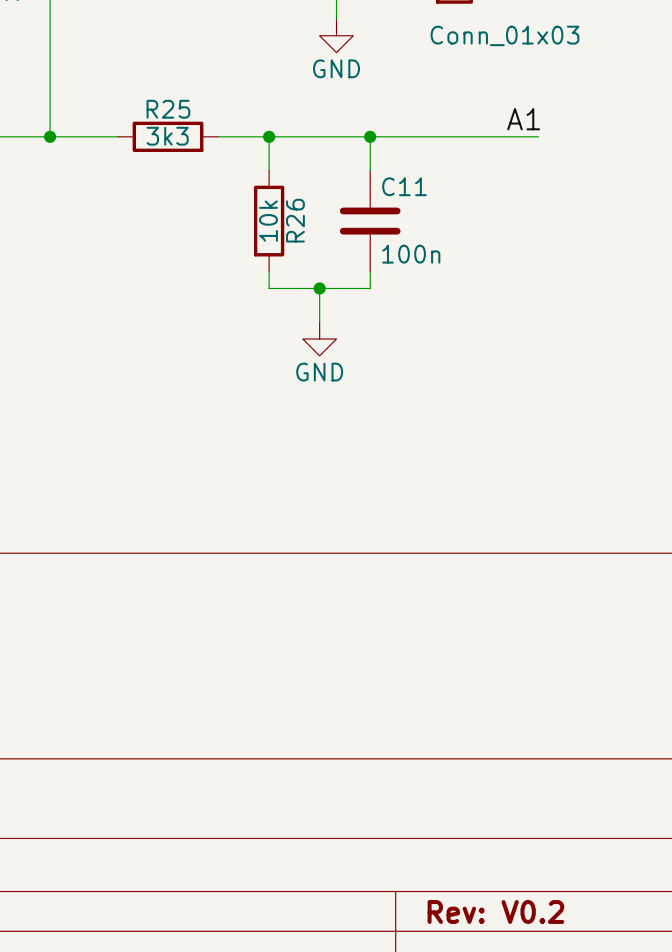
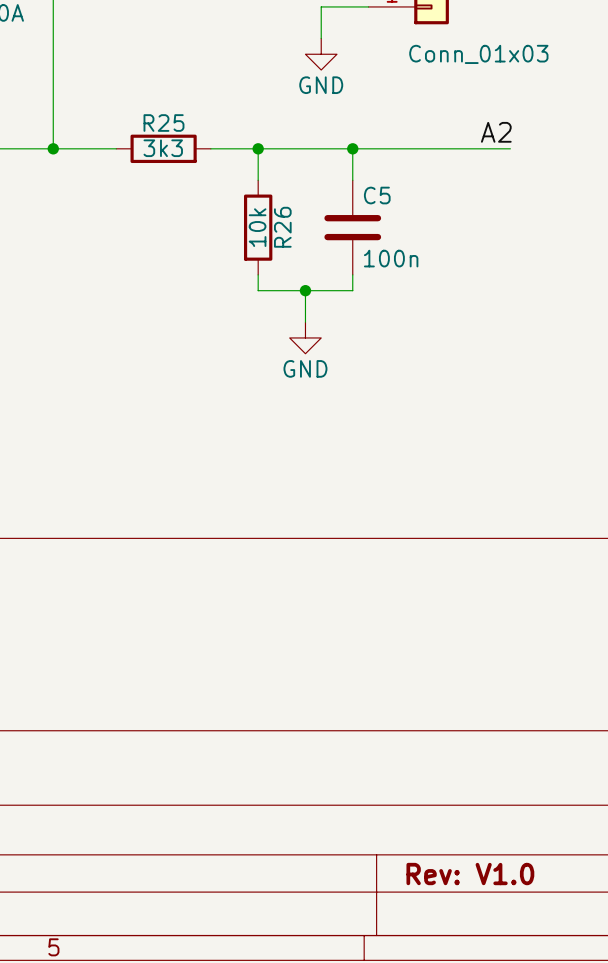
label: A1 (523, 119) -> A2 (496, 132)
C11 name: C11 (404, 186) -> C5 (377, 195)
title block: Rev: V0.2 (495, 911) -> Rev: V1.0 (470, 874)

